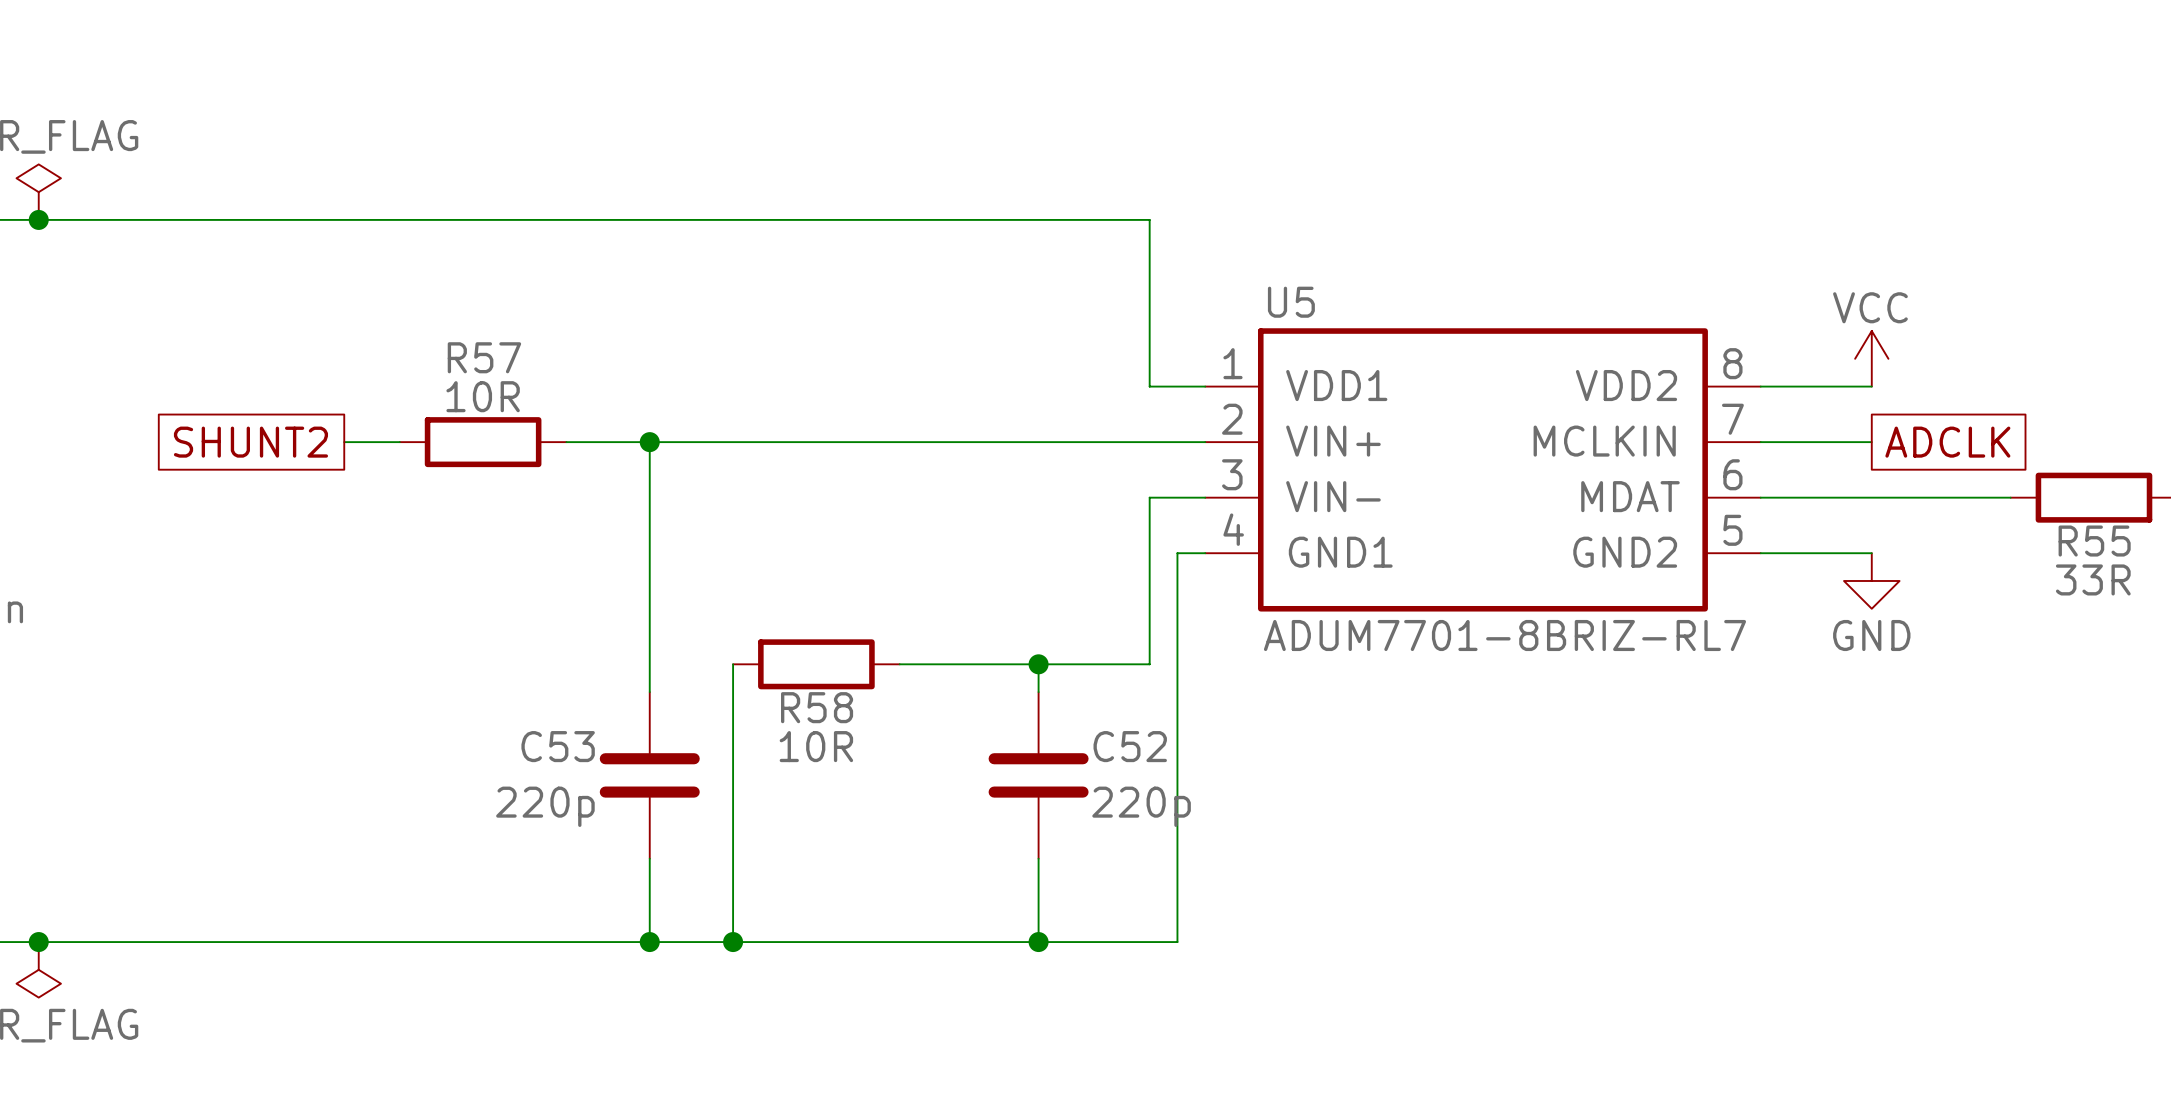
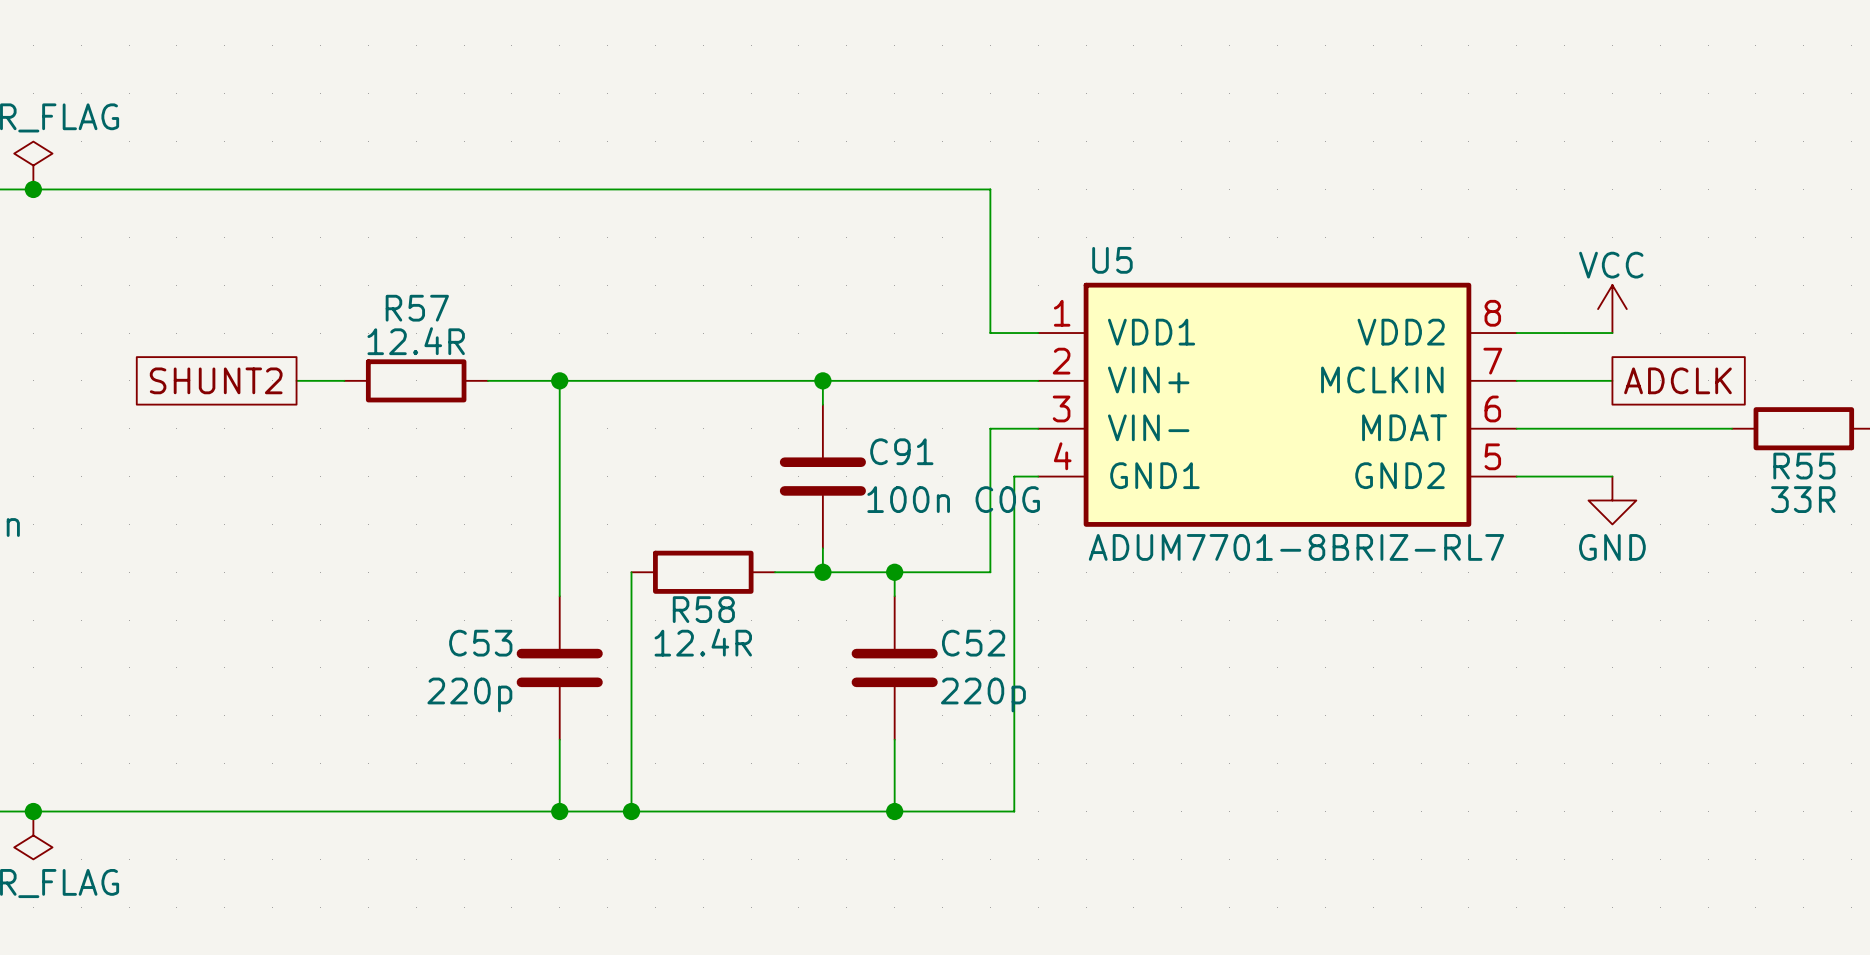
R57 value: 10R (483, 396) -> 12.4R (416, 341)
wire: none -> (822, 380) (822, 404)
junction: none -> (822, 380)
C91: none -> 100n C0G (822, 476)
wire: none -> (822, 548) (822, 572)
junction: none -> (822, 572)
R58 value: 10R (816, 746) -> 12.4R (703, 642)

